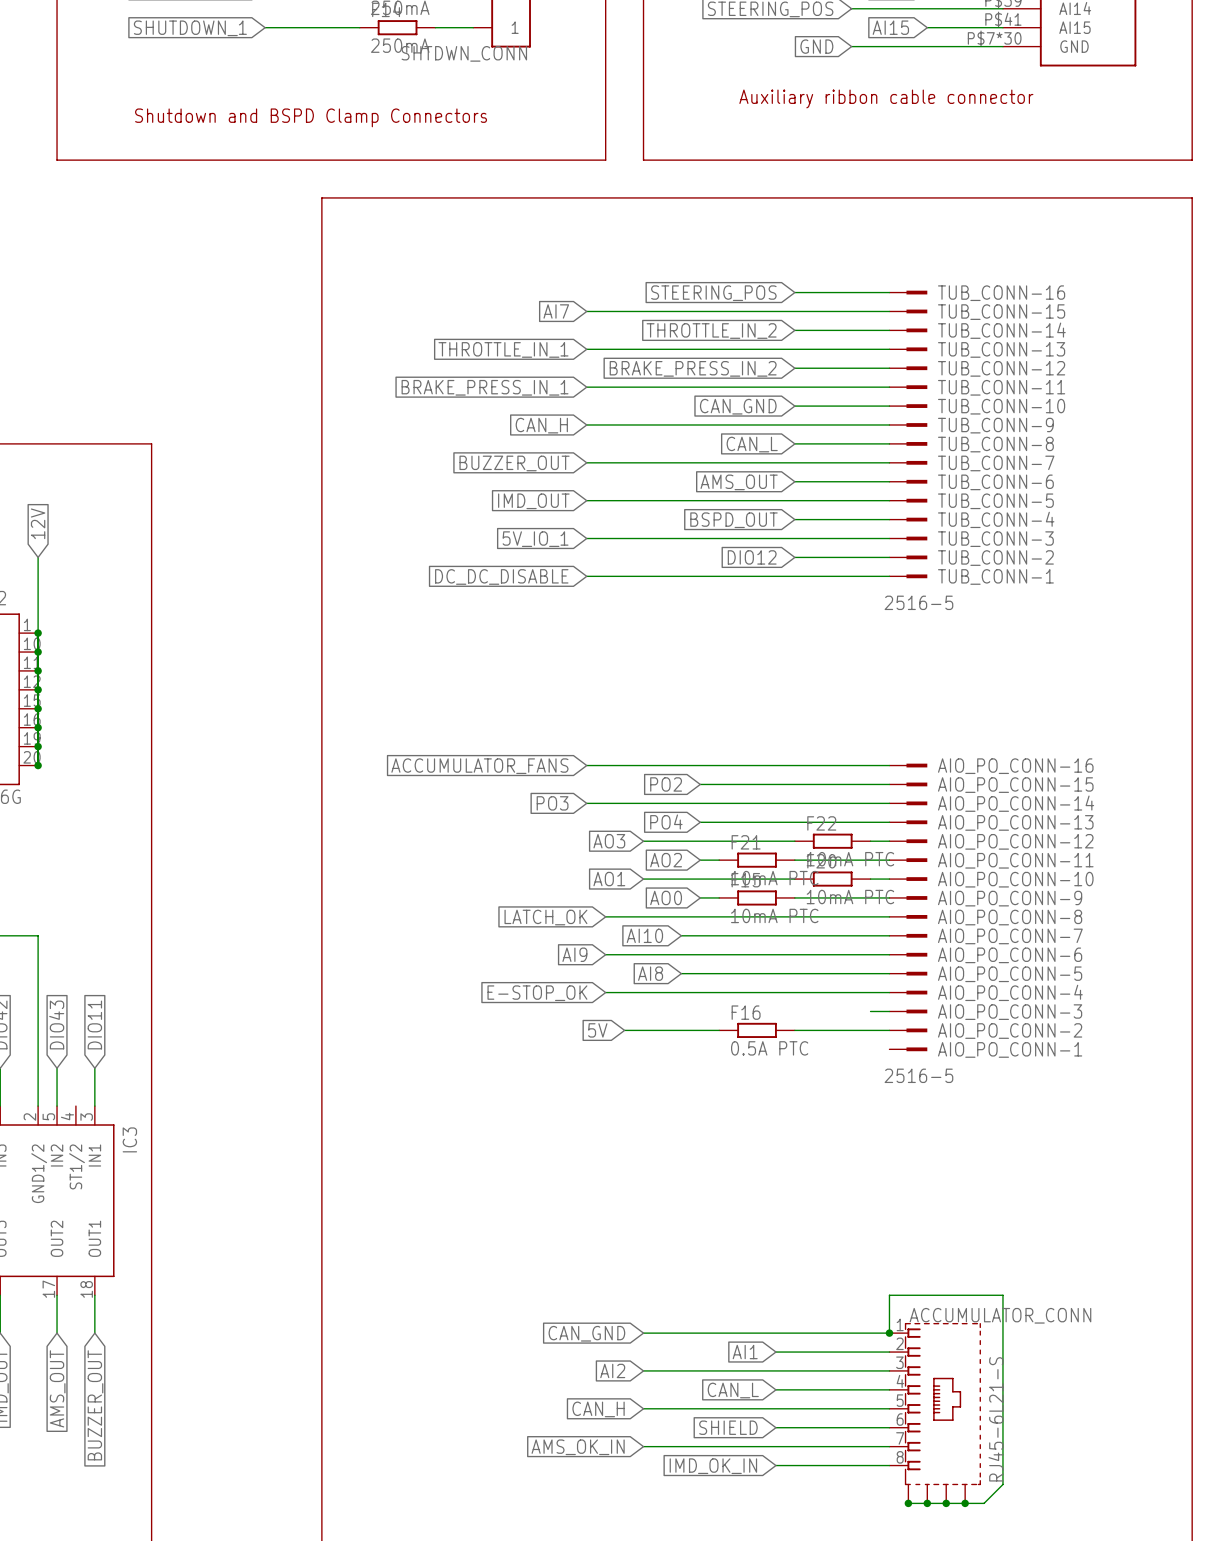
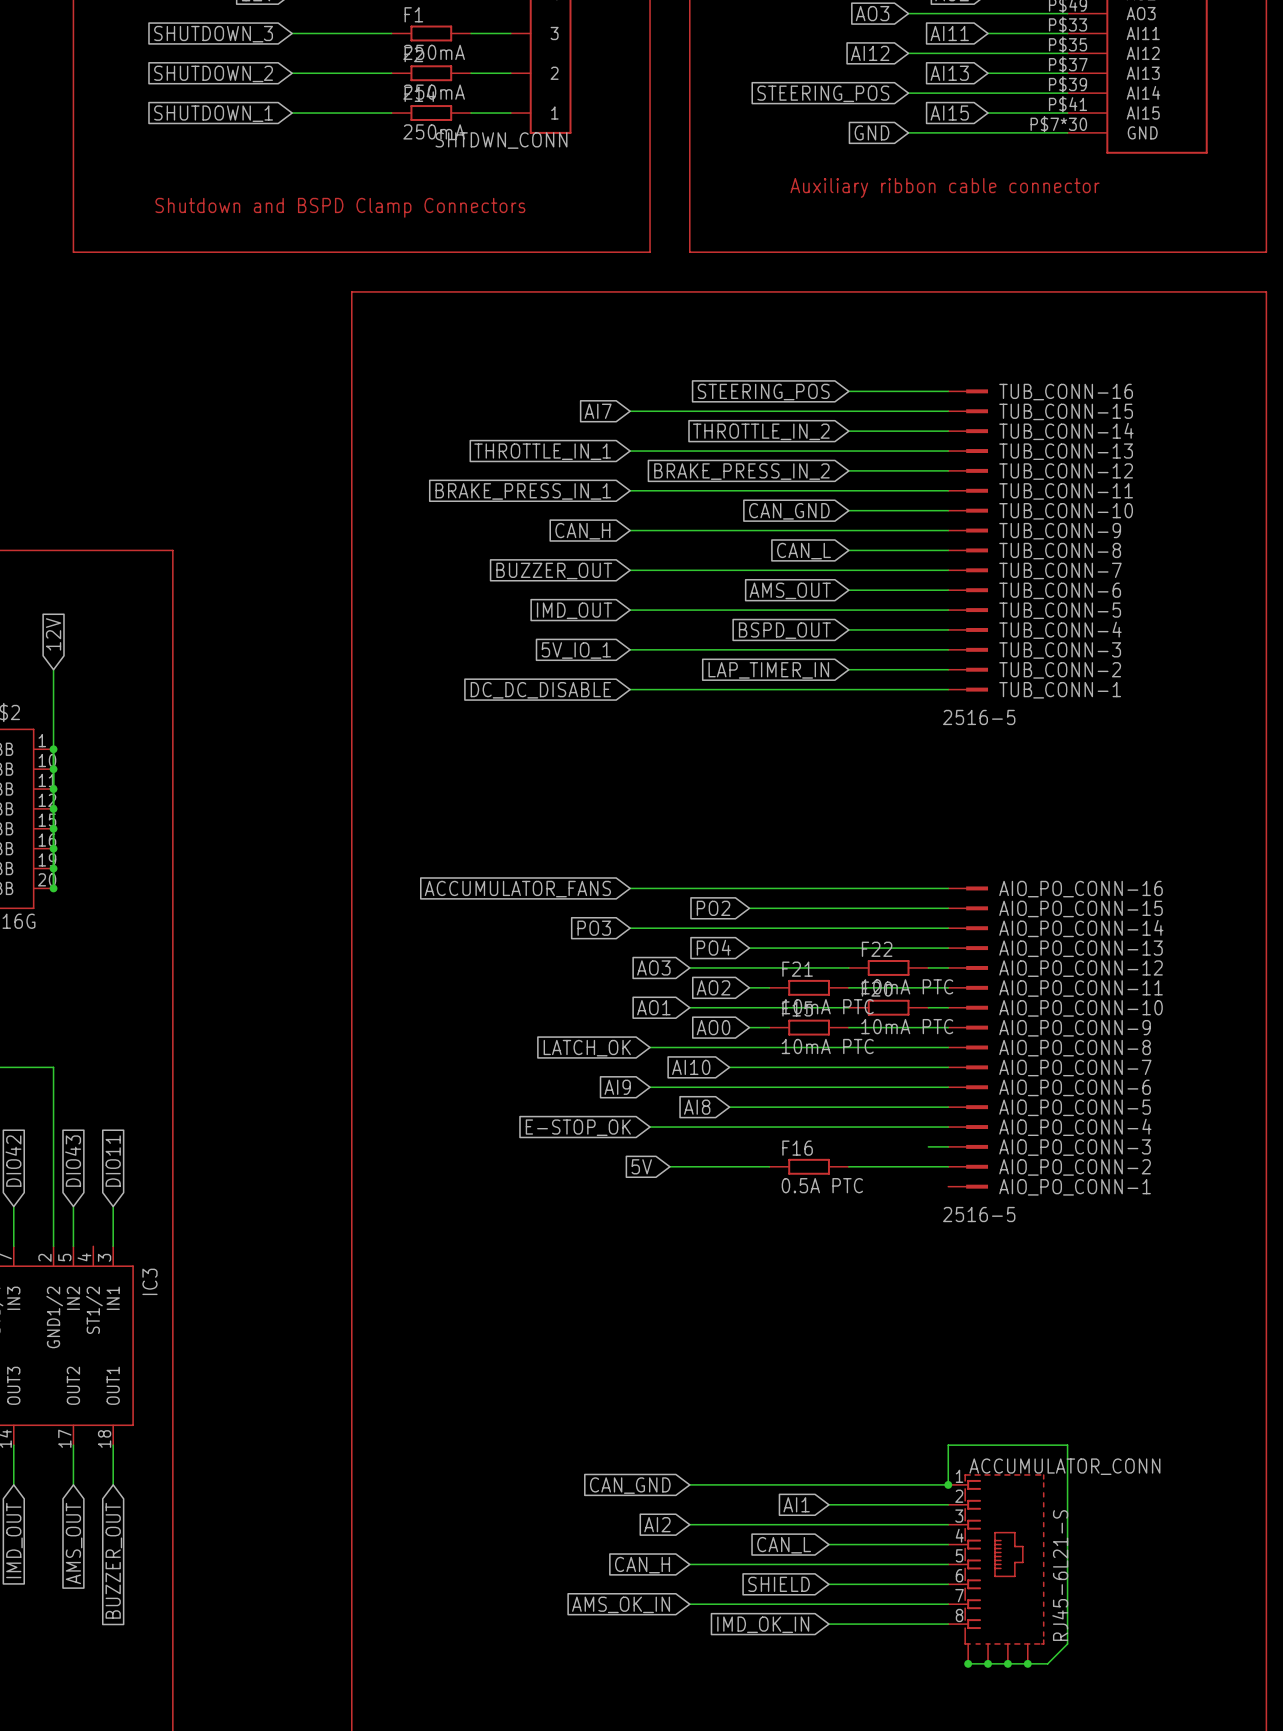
global label: DIO12 (752, 557) -> LAP_TIMER_IN (768, 670)

